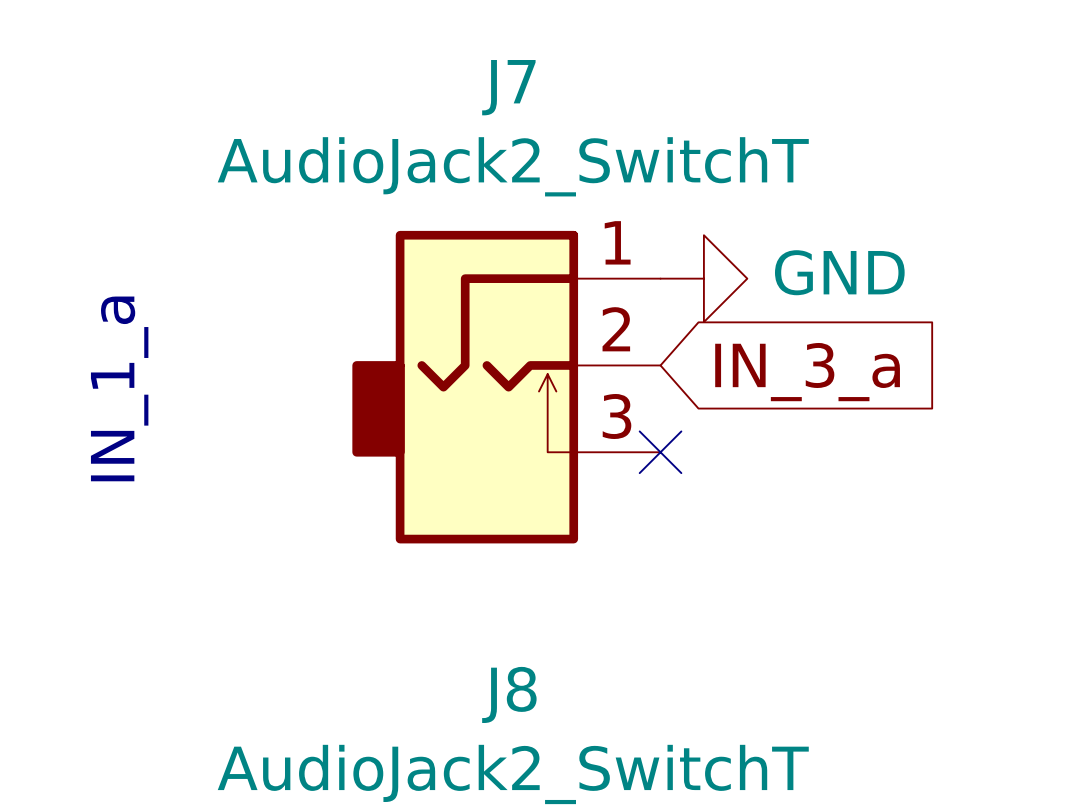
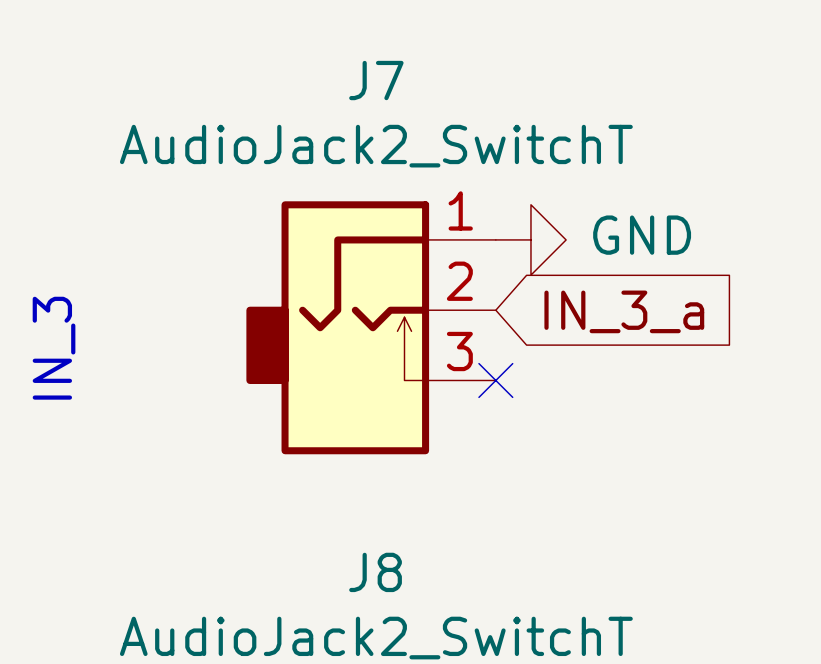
text: IN_1_a (119, 388) -> IN_3 (54, 348)

